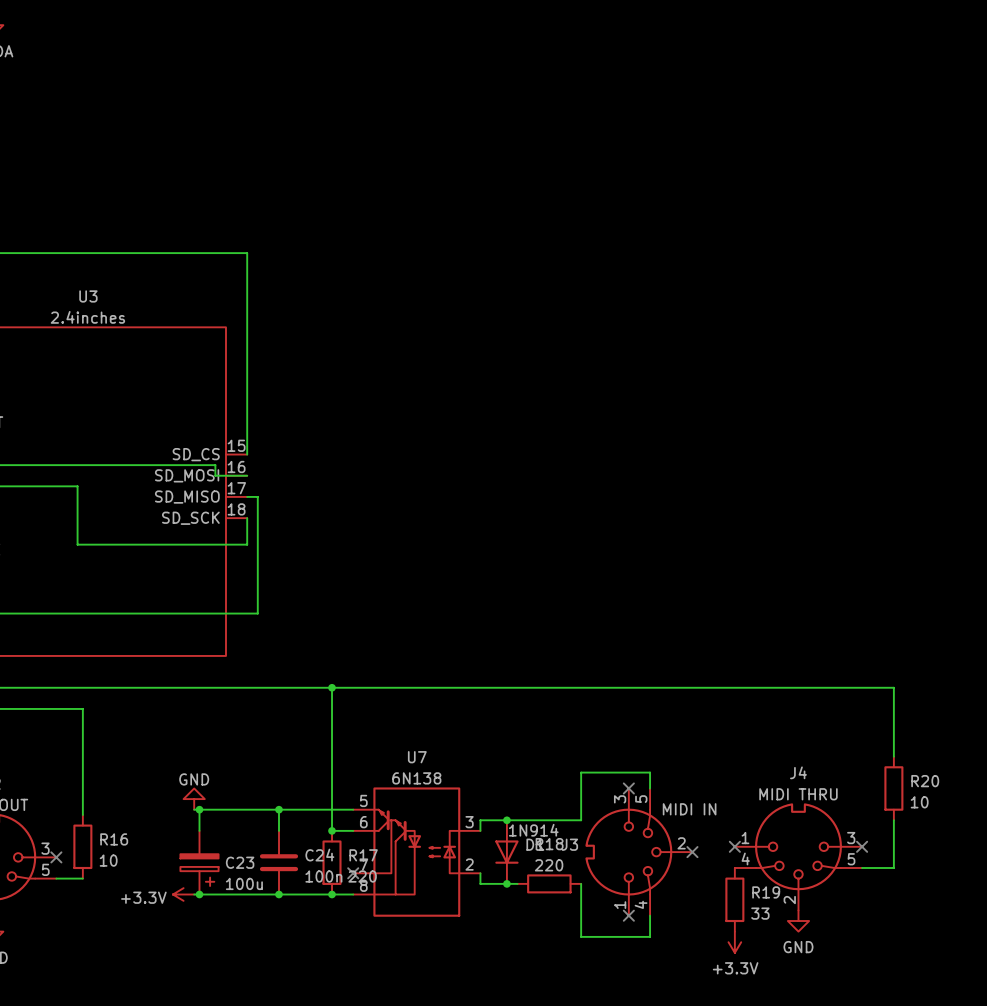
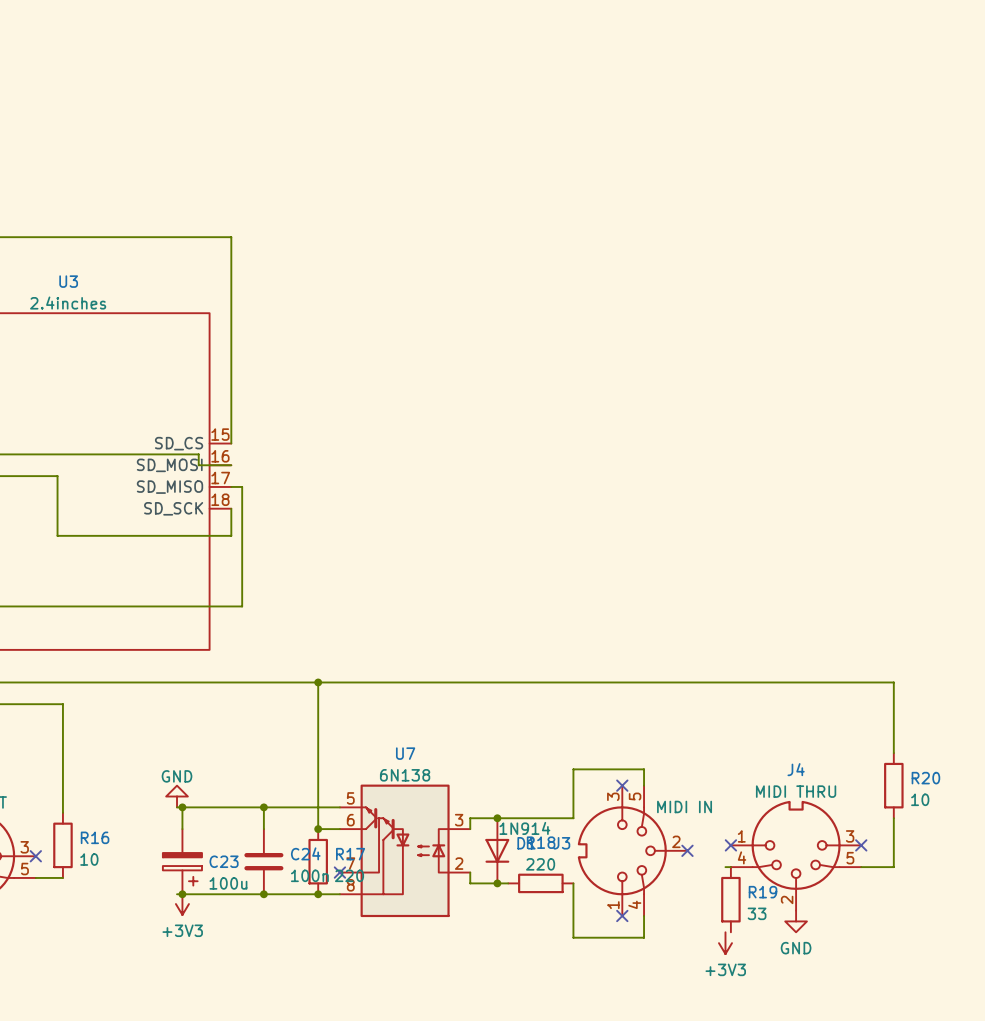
wire: none -> (725, 867) (730, 867)
power symbol: +3.3V (183, 894) -> none
power symbol: none -> +3V3 (182, 904)
power symbol: +3.3V (734, 942) -> +3V3 (725, 943)

